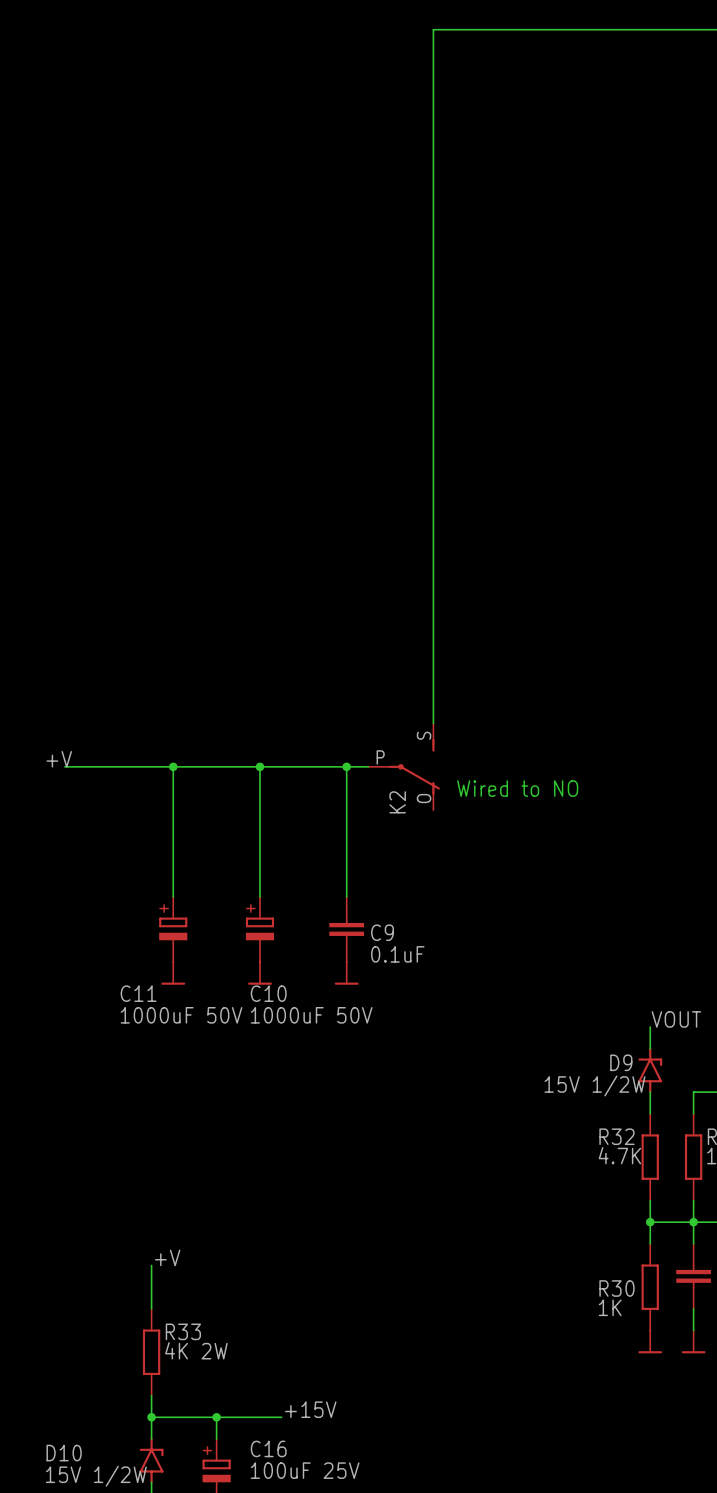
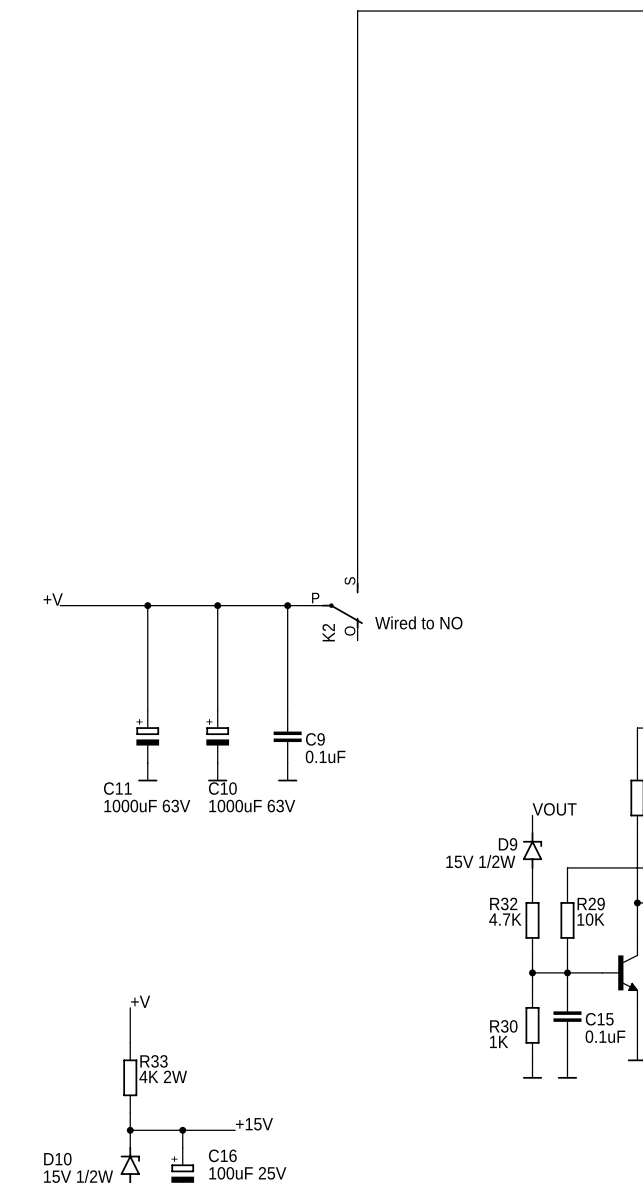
C11 value: 1000uF 50V (181, 1015) -> 1000uF 63V (147, 806)
C10 value: 1000uF 50V (311, 1015) -> 1000uF 63V (252, 806)

